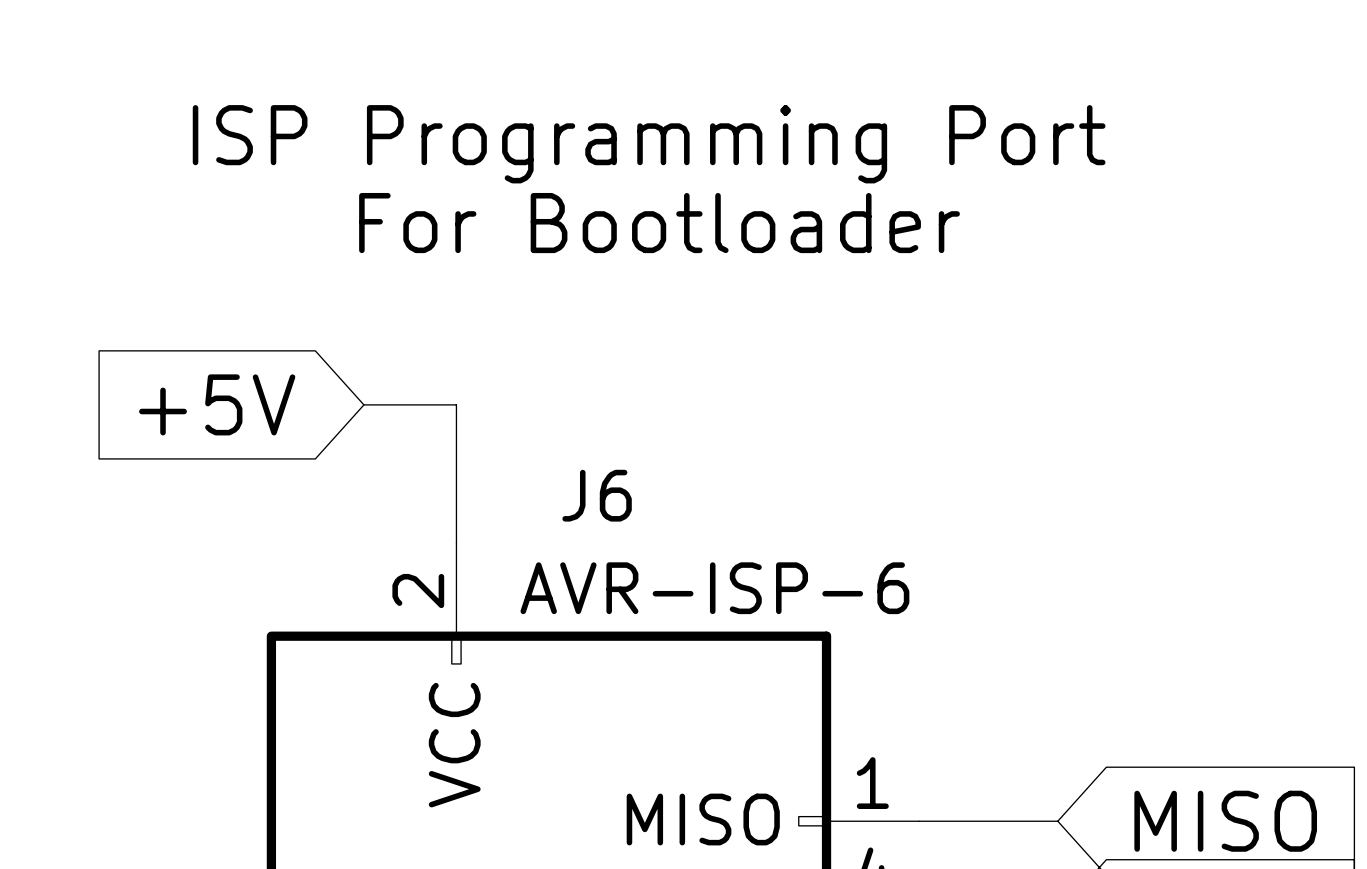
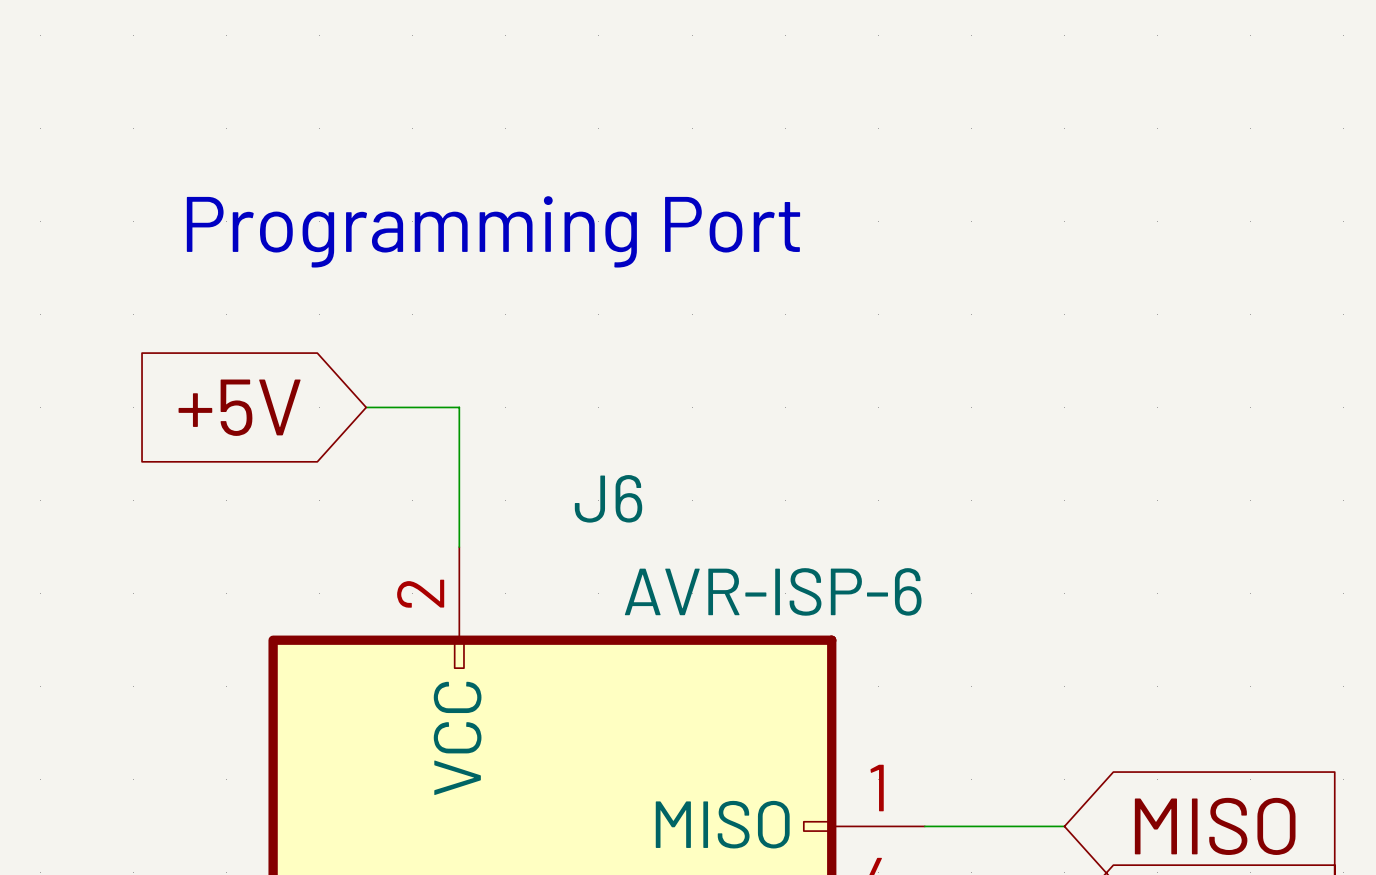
text: ISP Programming Port (649, 144) -> none
text: For Bootloader (659, 223) -> Programming Port (493, 231)

